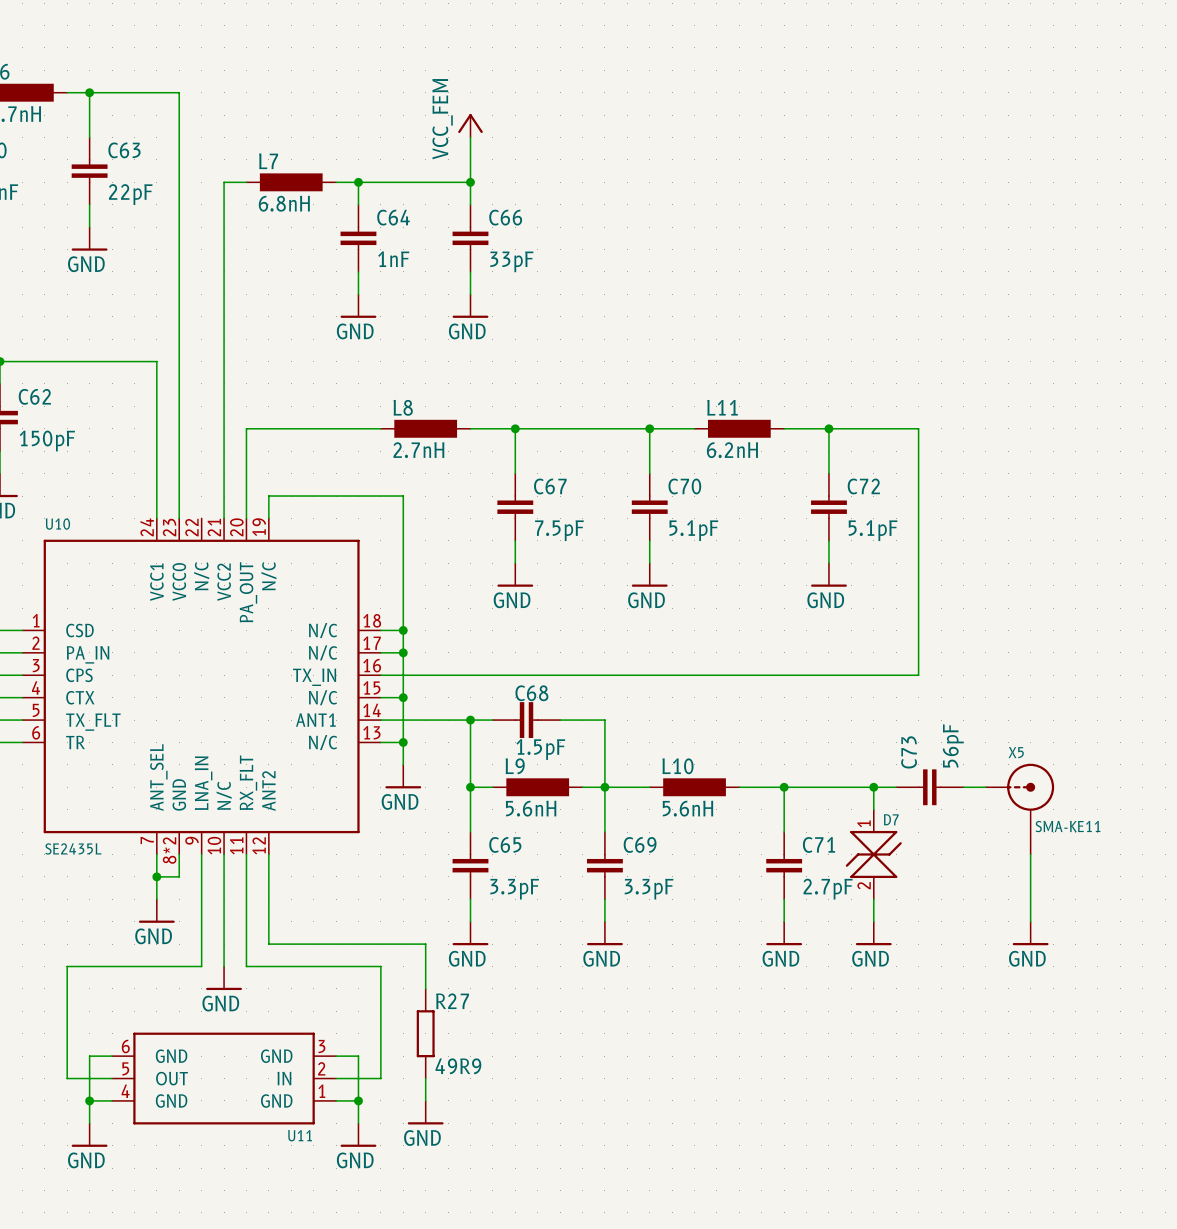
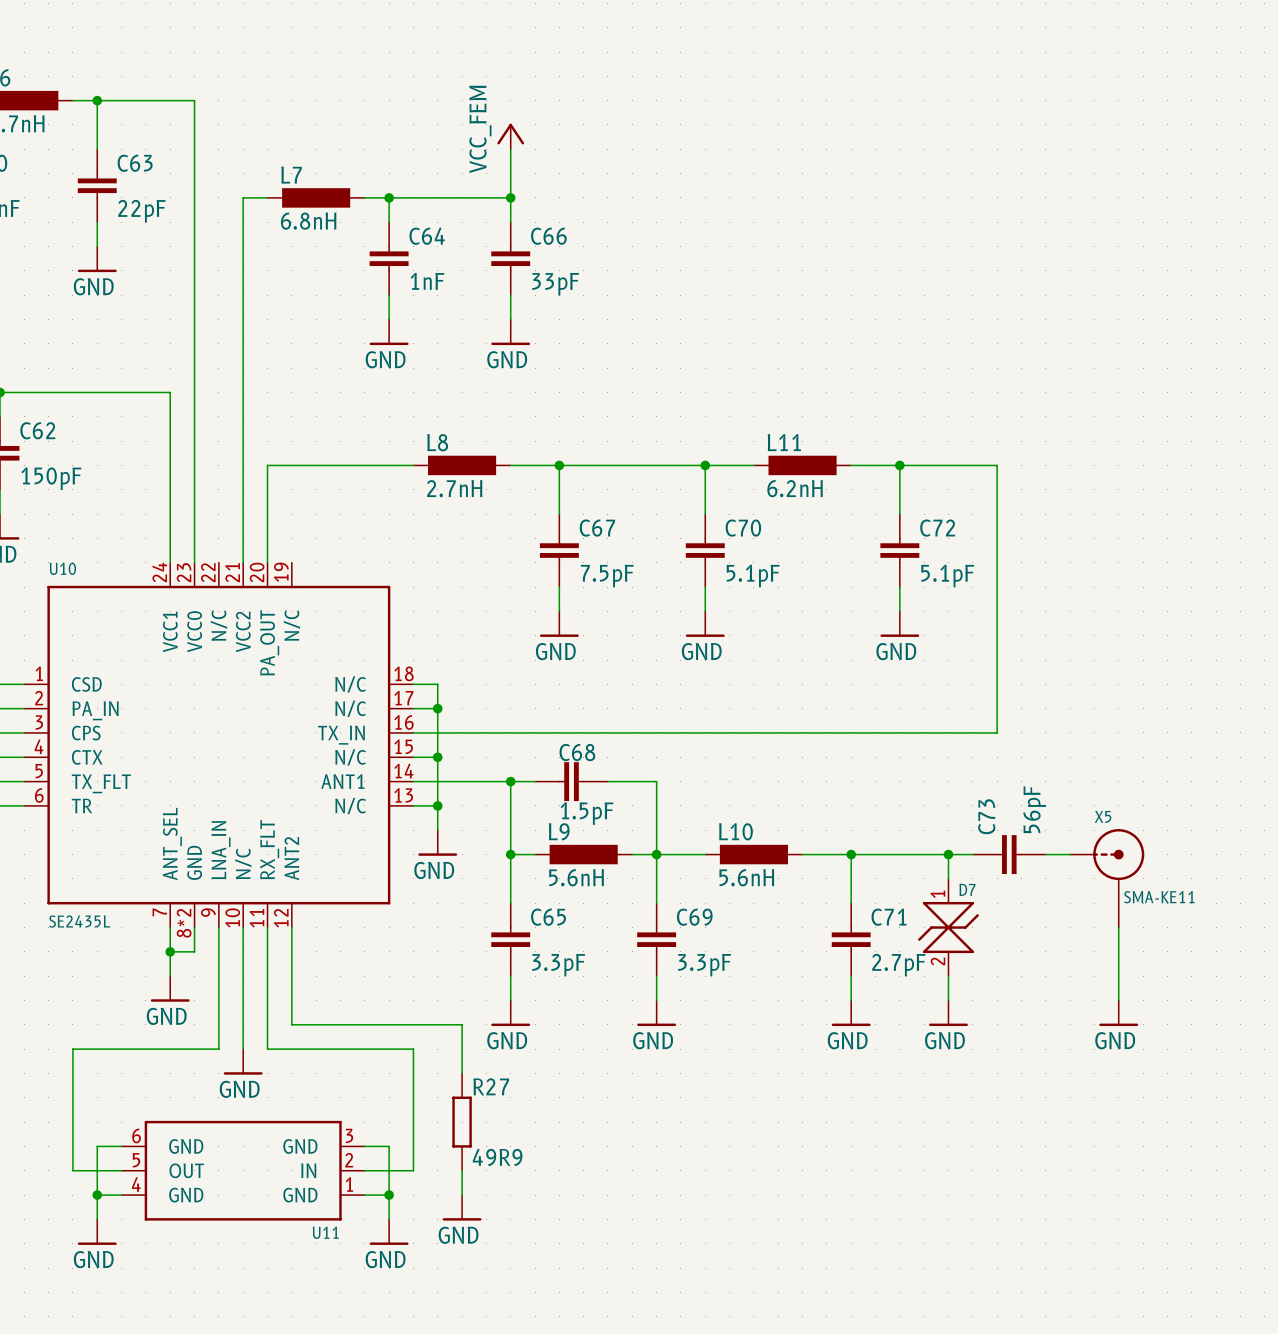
wire: (268, 518) (268, 496) (403, 496) (403, 630) -> none
junction: (403, 630) -> none

